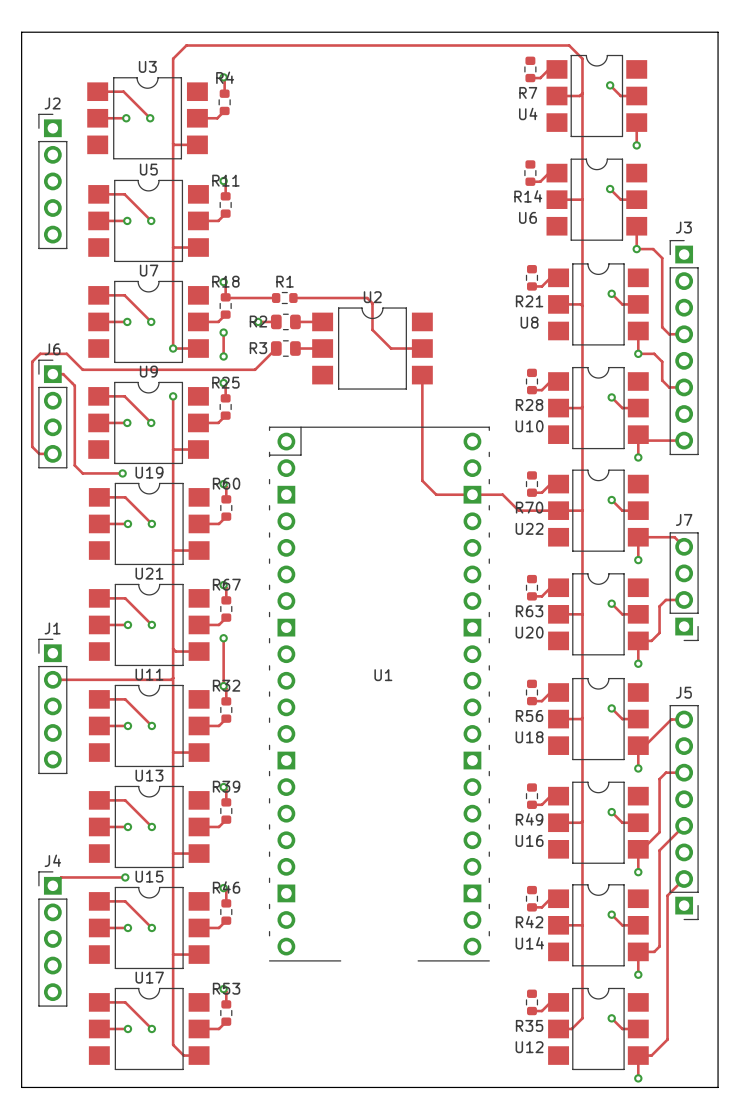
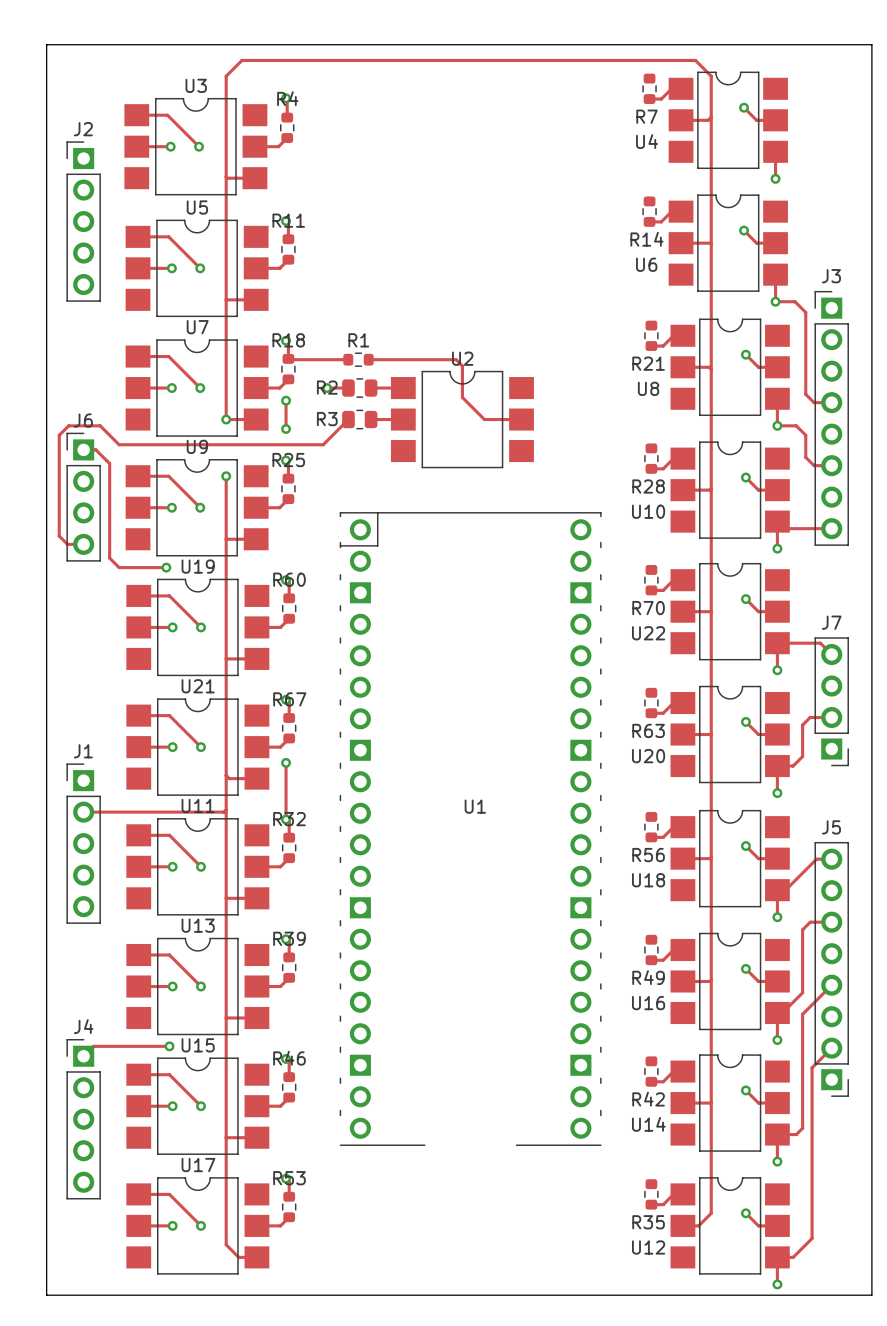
track: (422, 375) (422, 480) (436, 494) (502, 494) (518, 510) (558, 510) -> none

